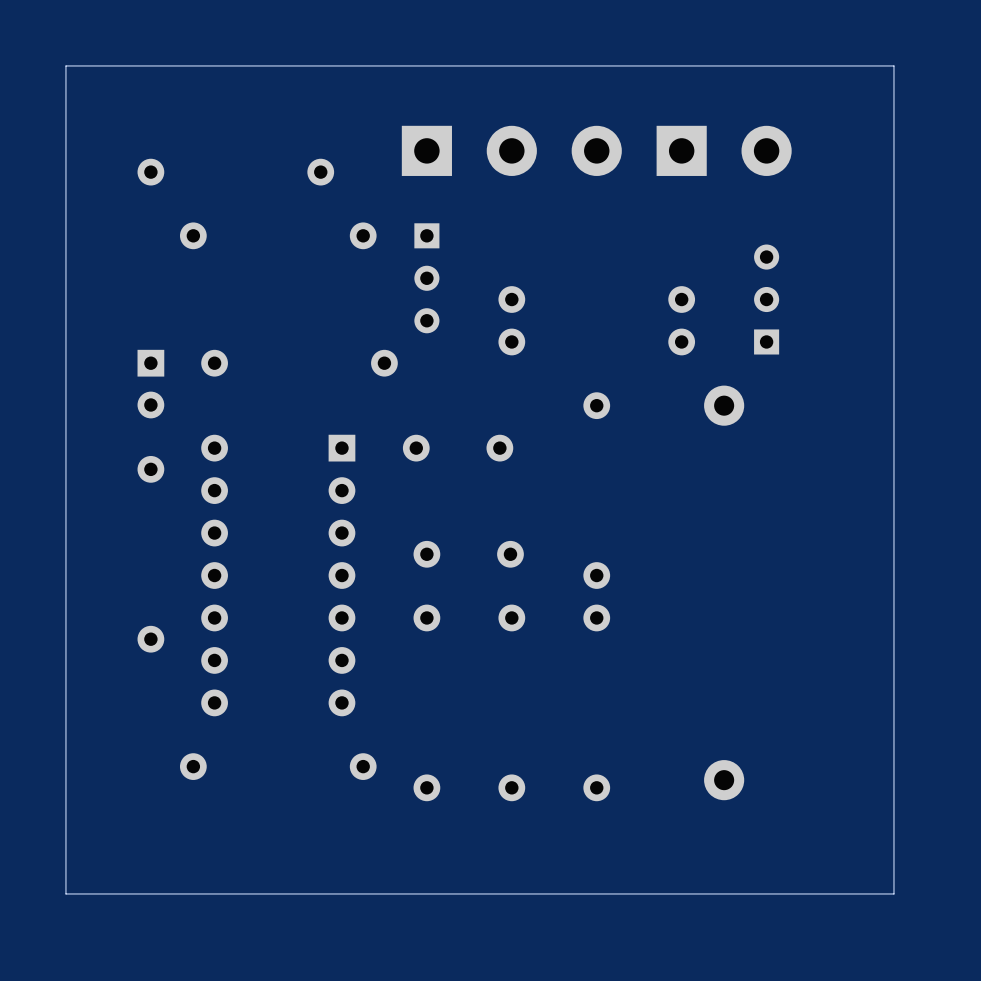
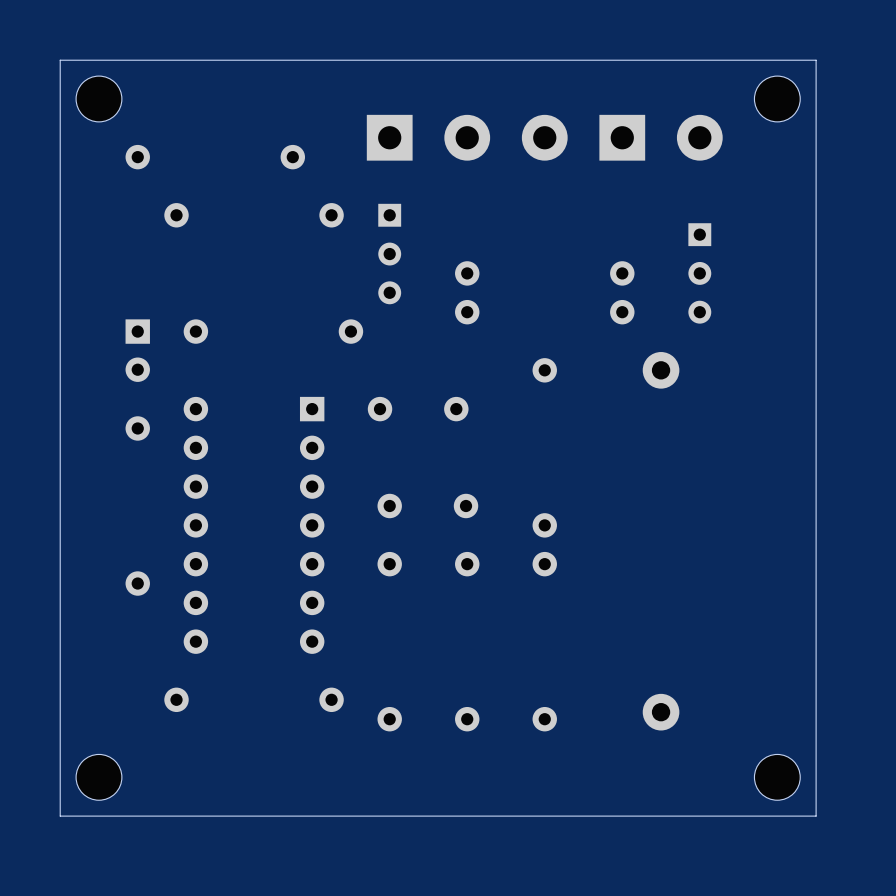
part: none -> (98, 98)
part: none -> (777, 98)
part rotation: 0° (766, 299) -> 180° (699, 273)
part: none -> (98, 777)
part: none -> (777, 777)

